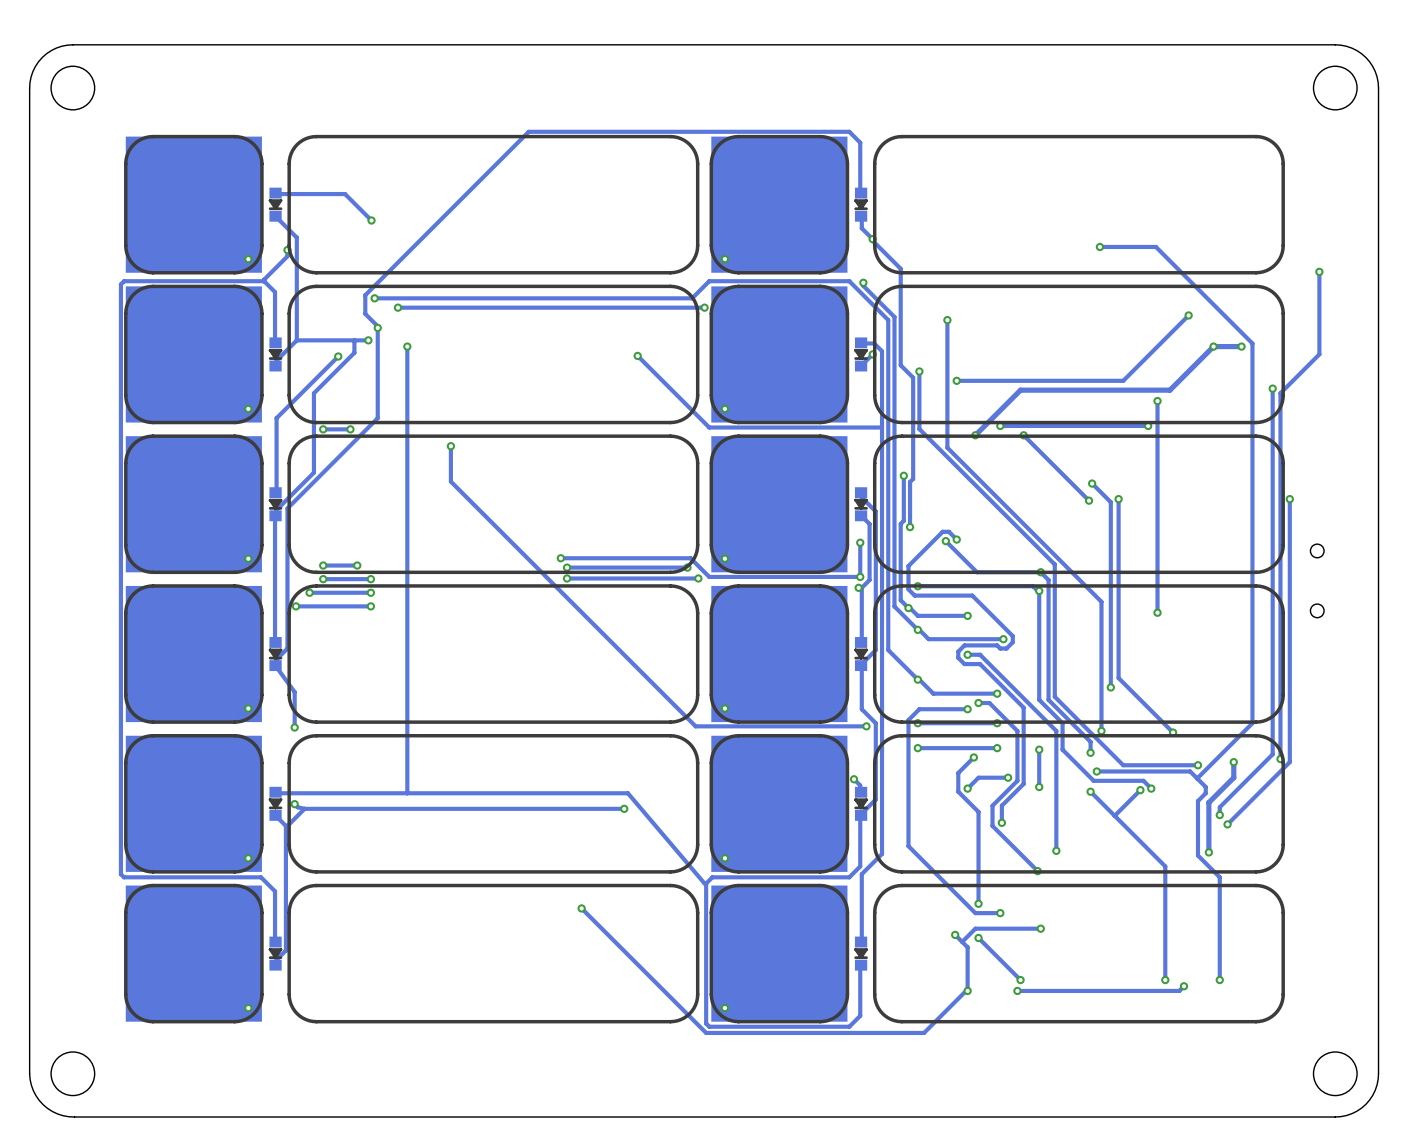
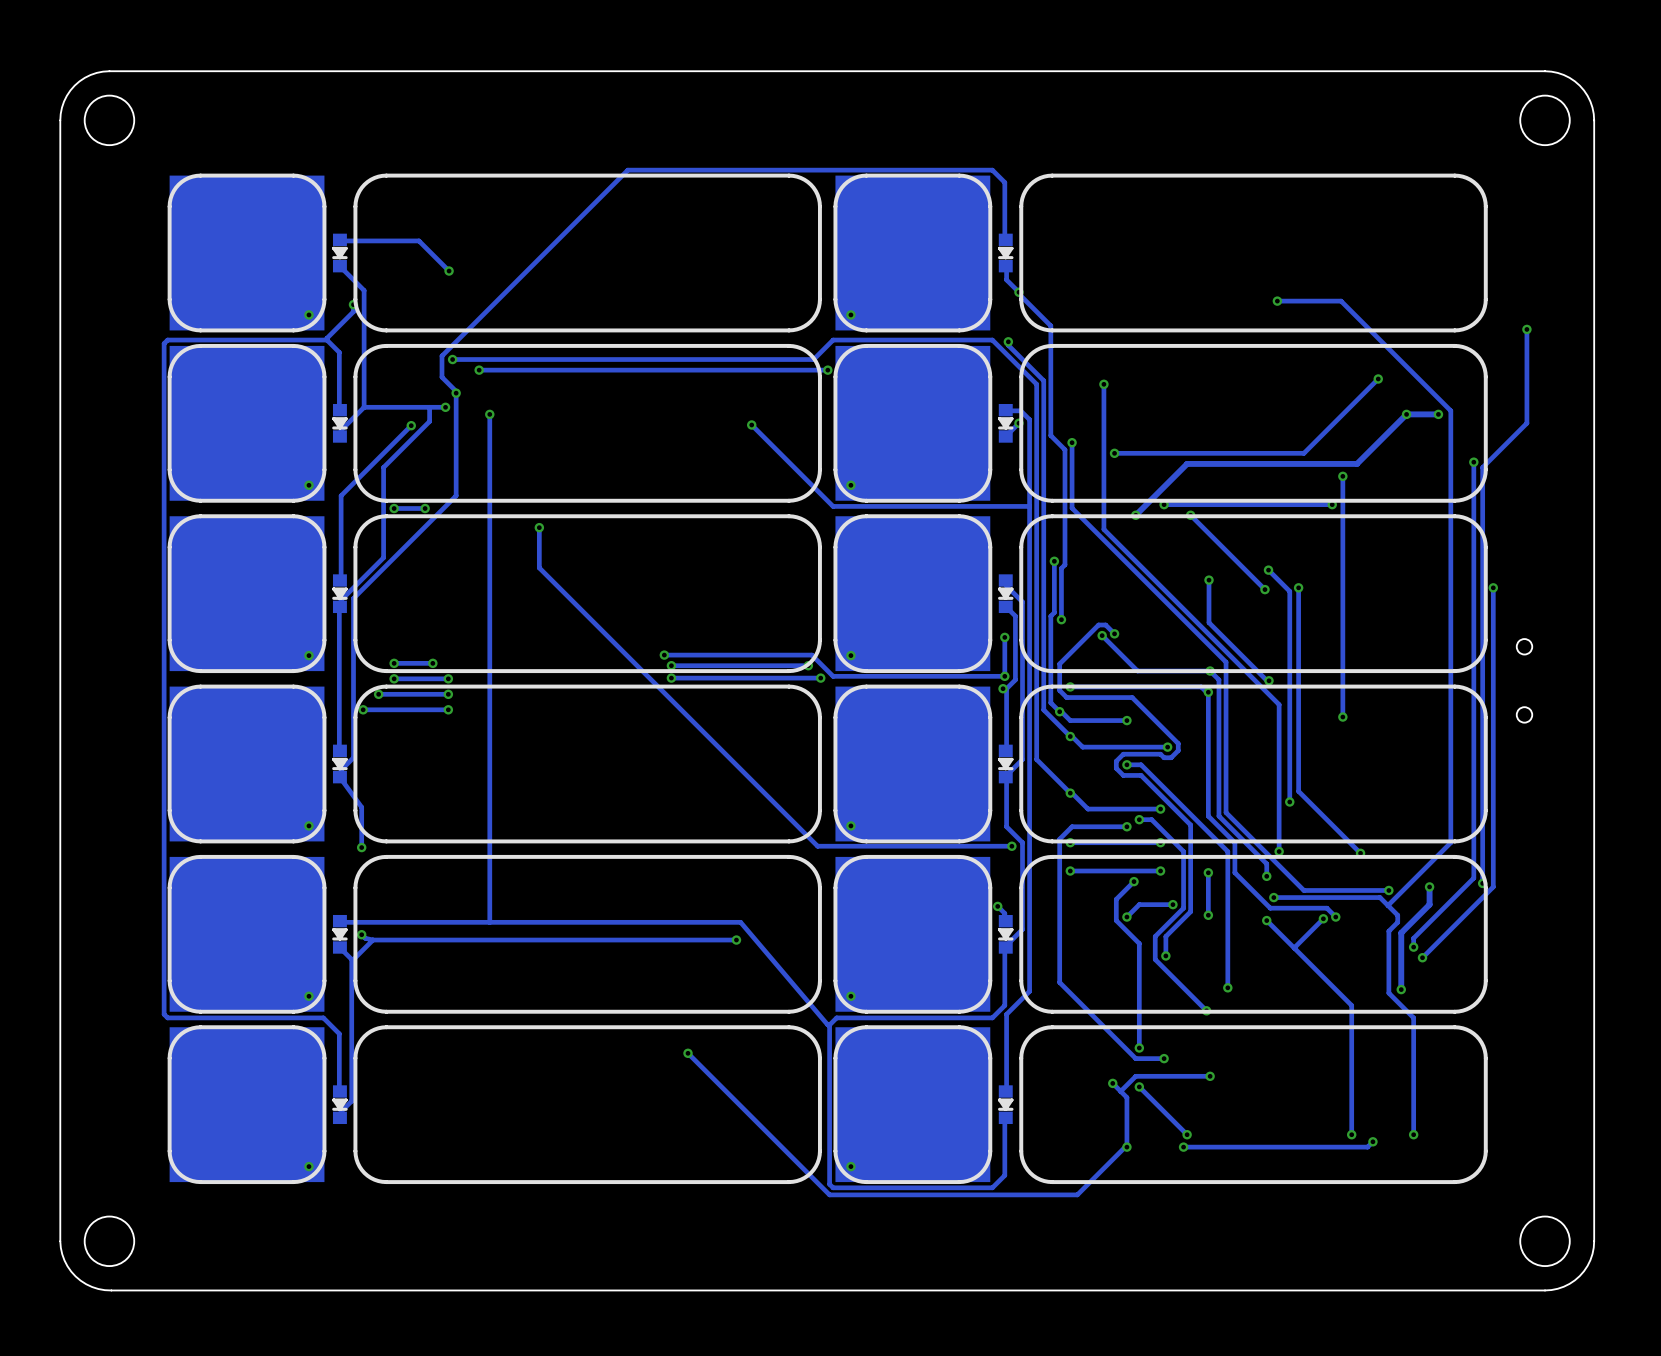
track: none -> (1209, 580) (1209, 622) (1269, 680)
via: none -> (1209, 580)
via: none -> (1269, 680)

